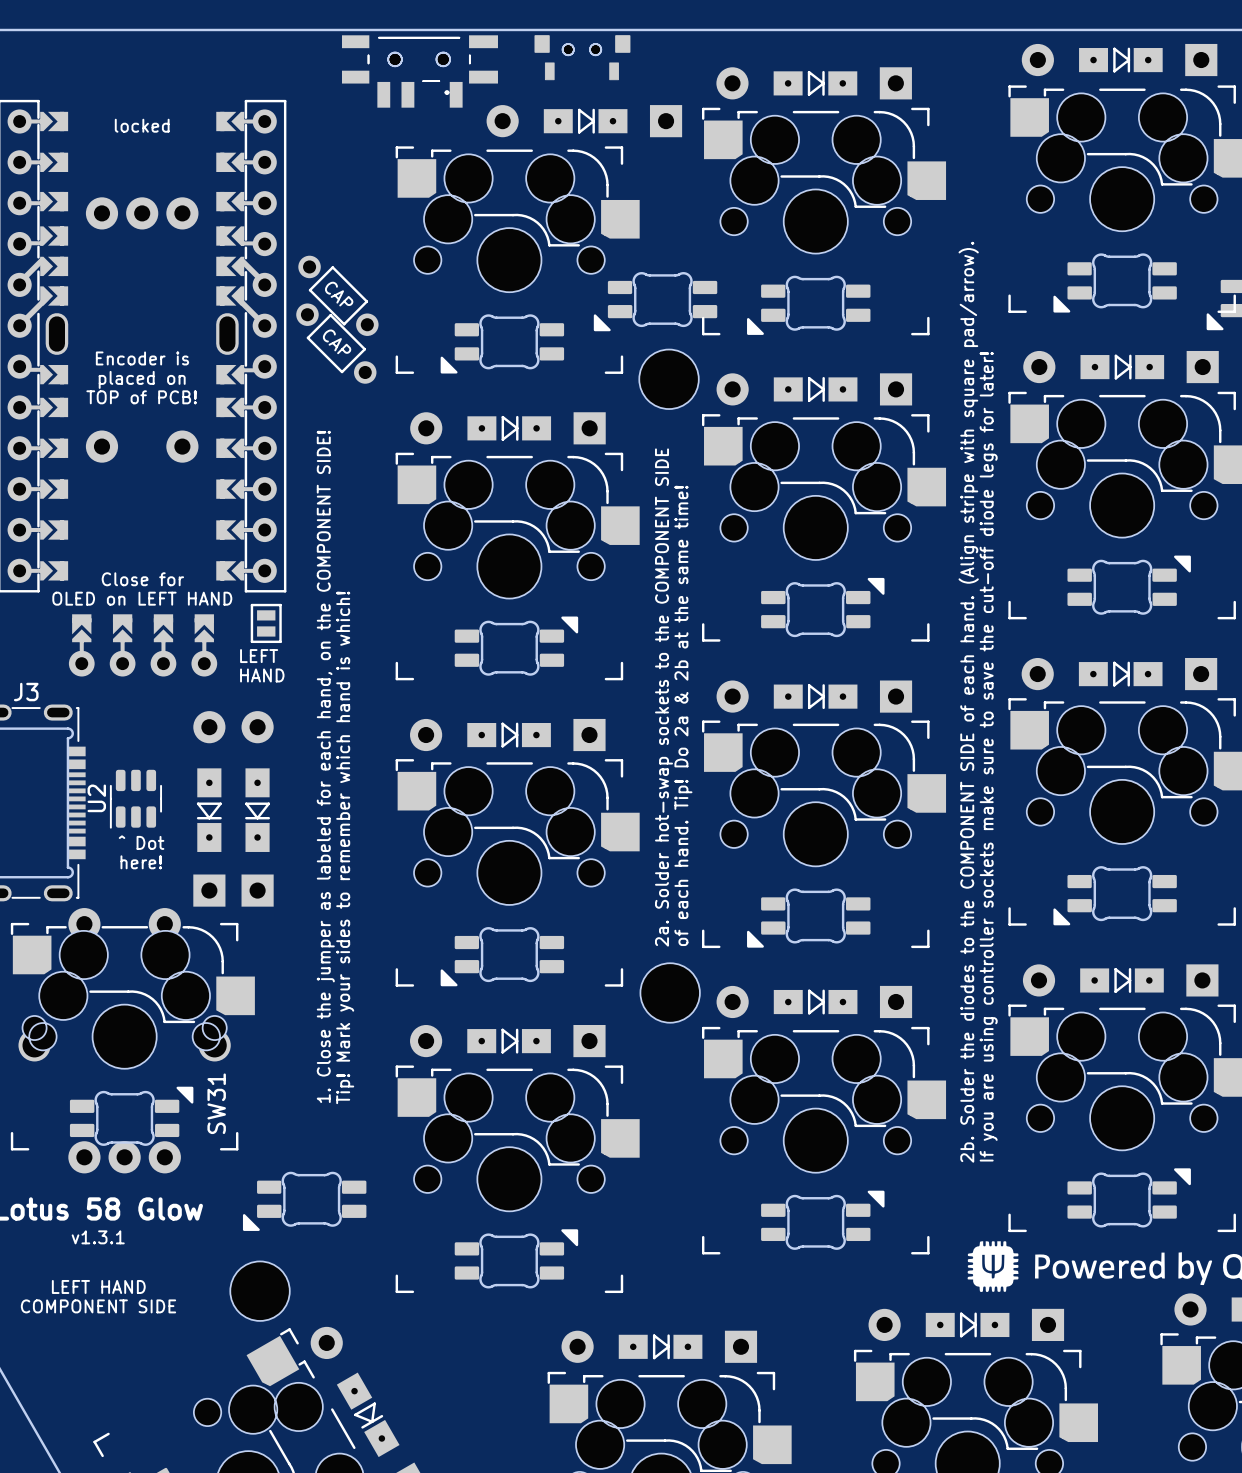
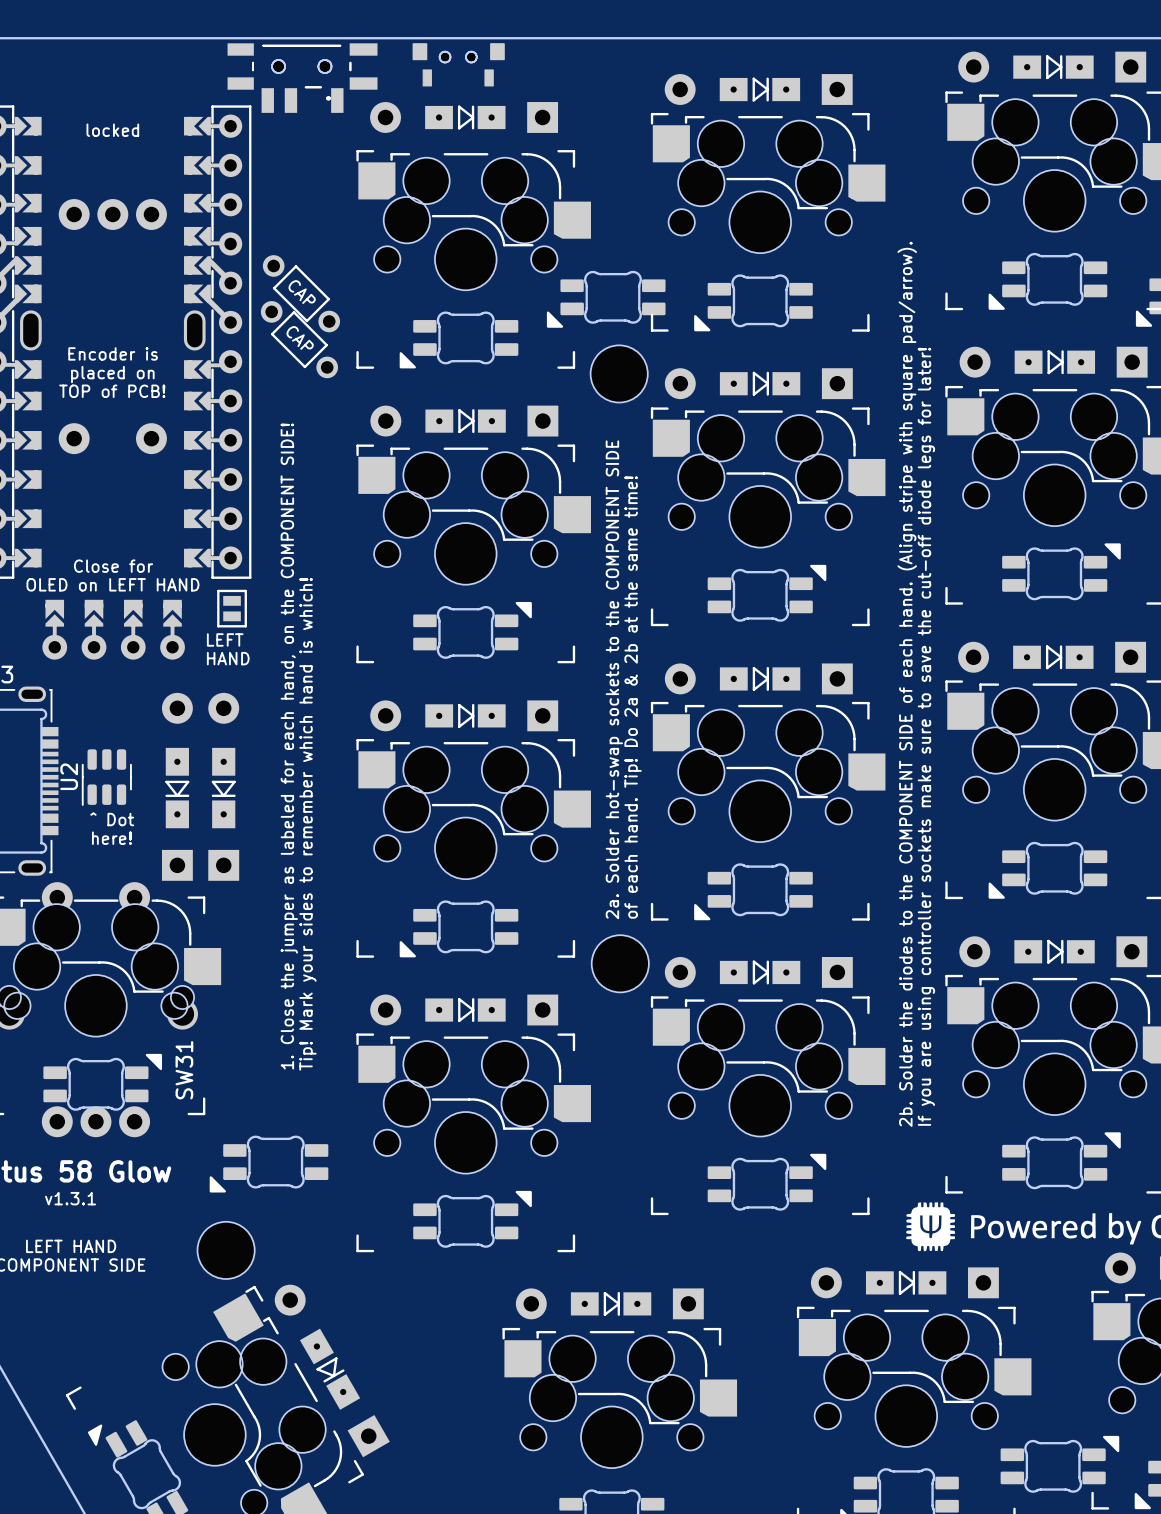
part position: (581, 49) -> (458, 57)
part position: (582, 57) -> (458, 64)
part position: (419, 59) -> (301, 66)
part position: (419, 71) -> (302, 78)
part position: (584, 121) -> (464, 117)

